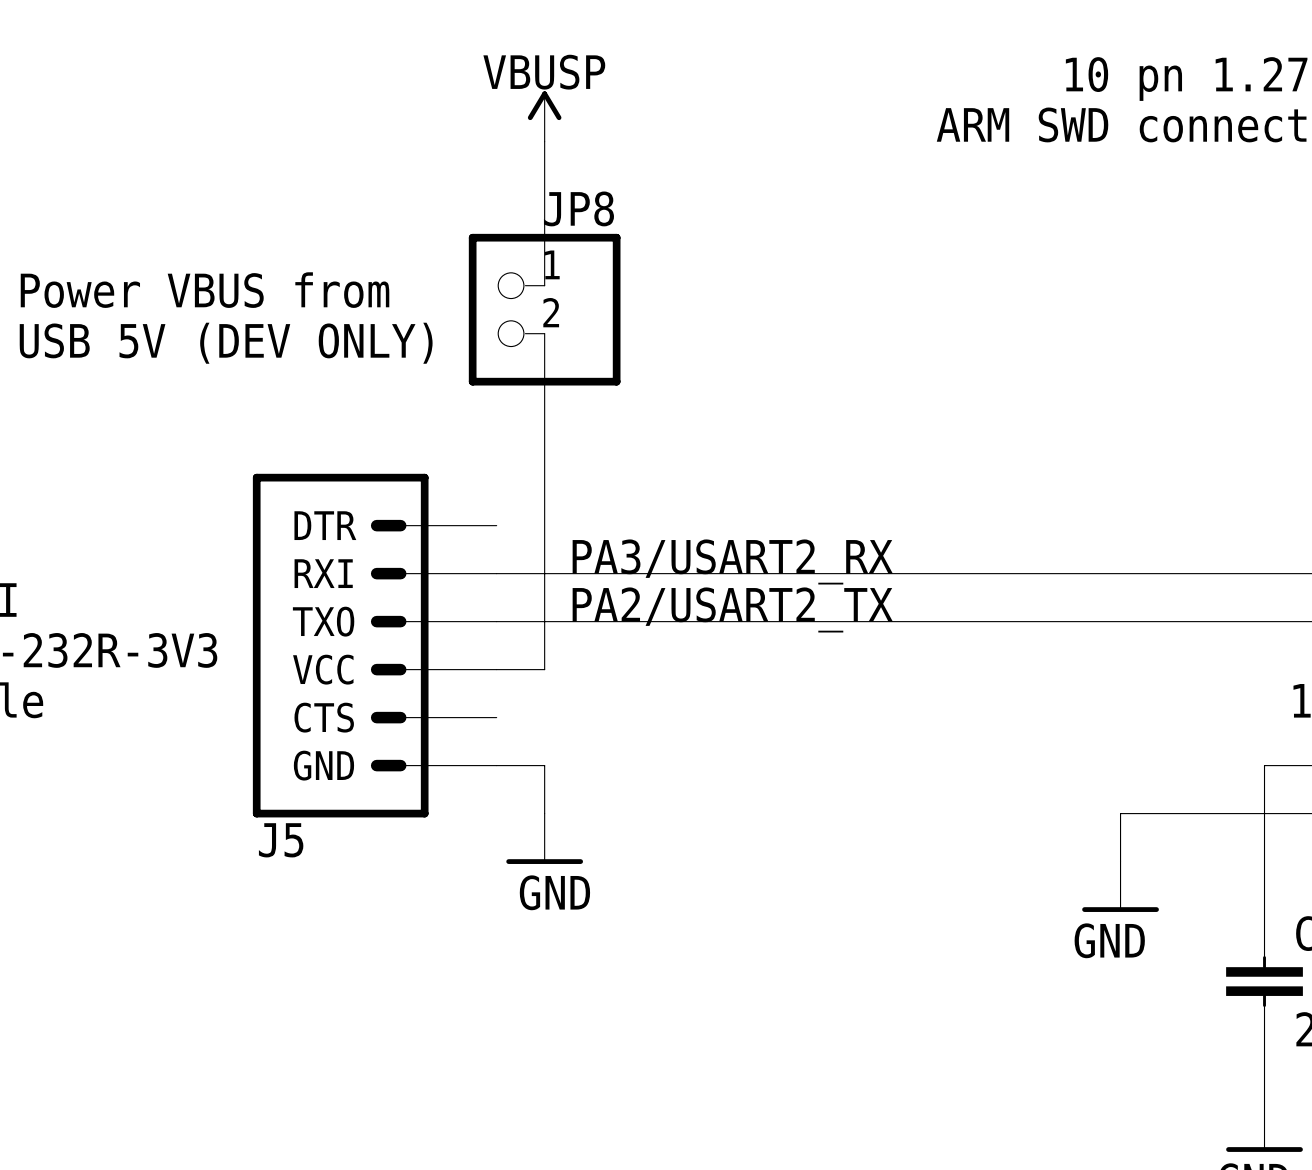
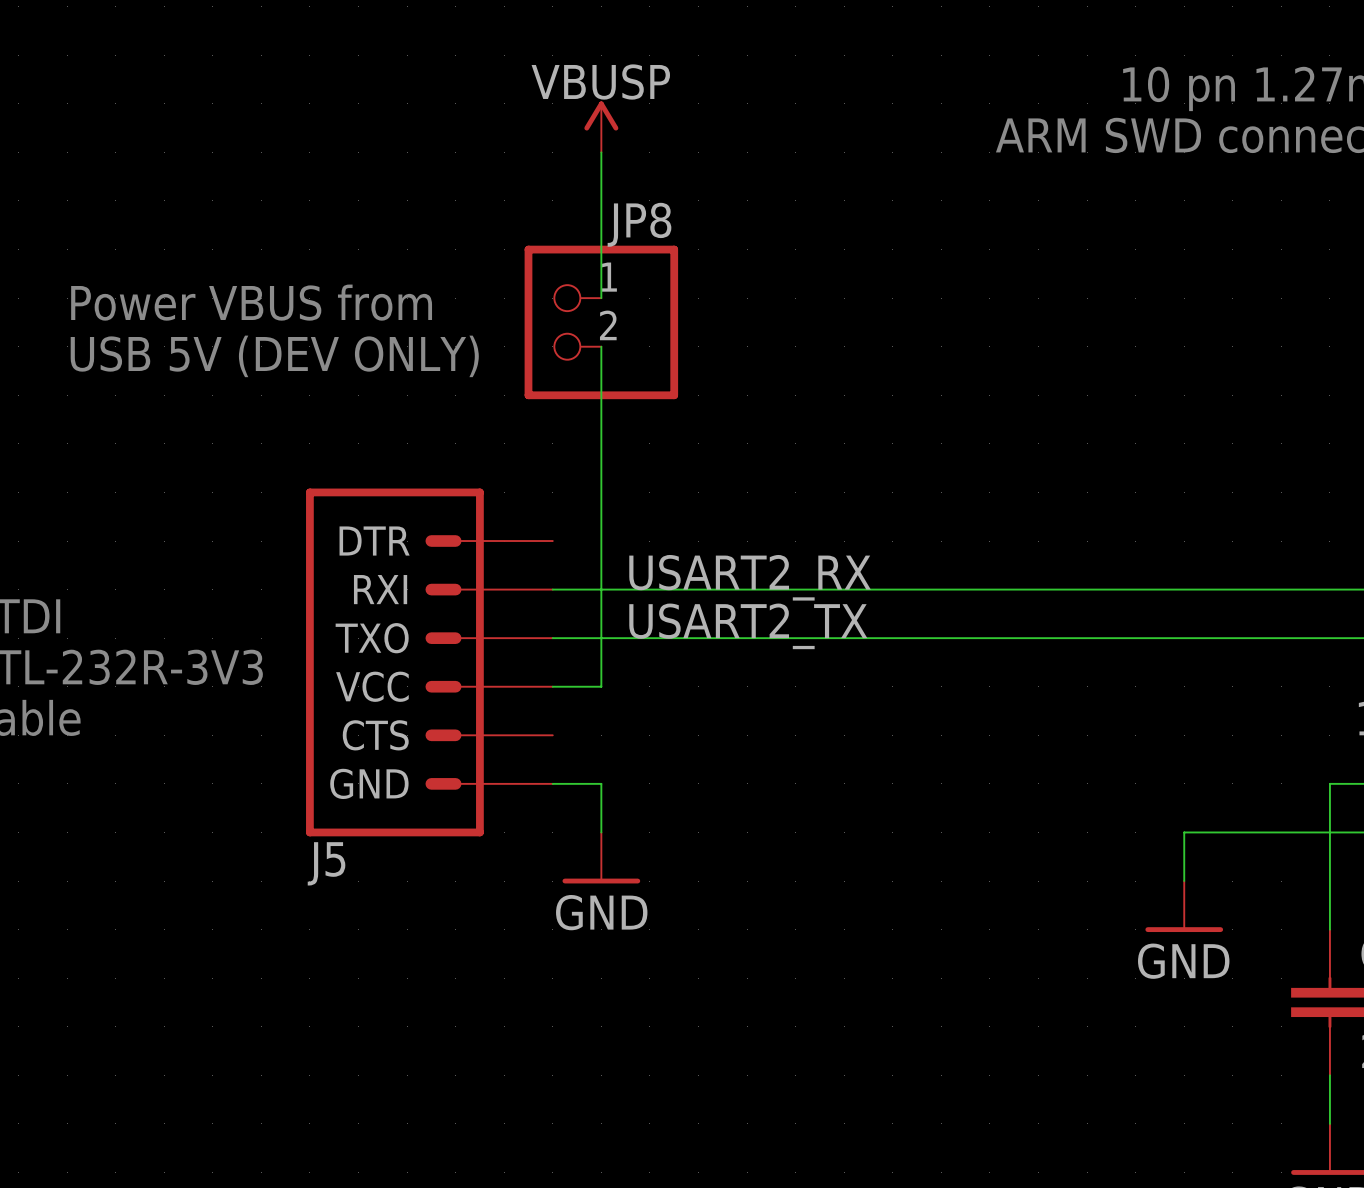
label: PA3/USART2_RX (732, 561) -> USART2_RX (750, 577)
label: PA2/USART2_TX (732, 609) -> USART2_TX (748, 626)

